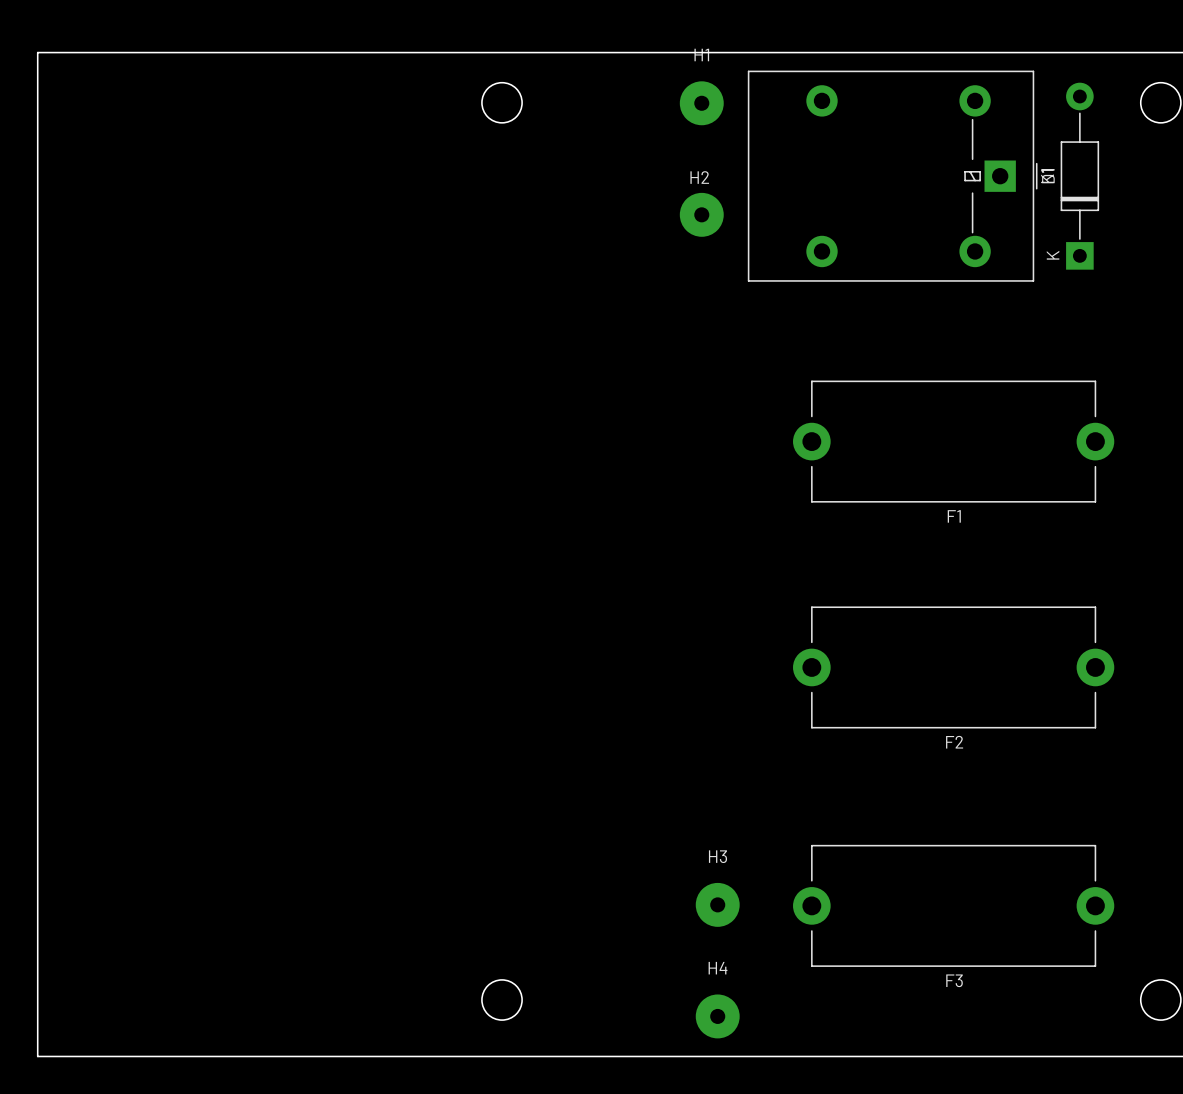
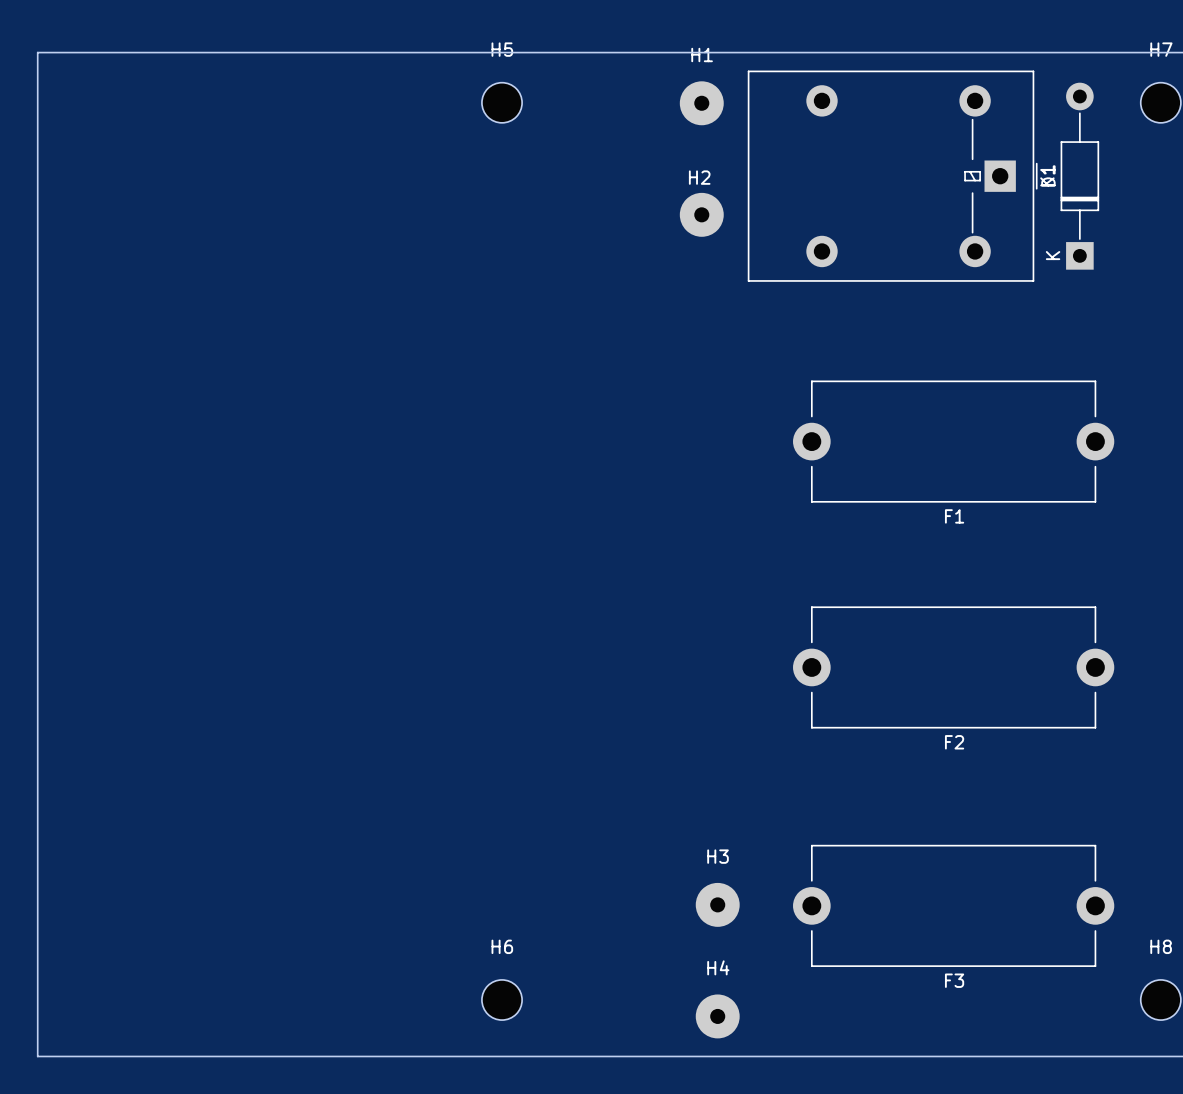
H5 name: none -> H5 (502, 49)
H7 name: none -> H7 (1161, 49)
H6 name: none -> H6 (502, 946)
H8 name: none -> H8 (1161, 946)

